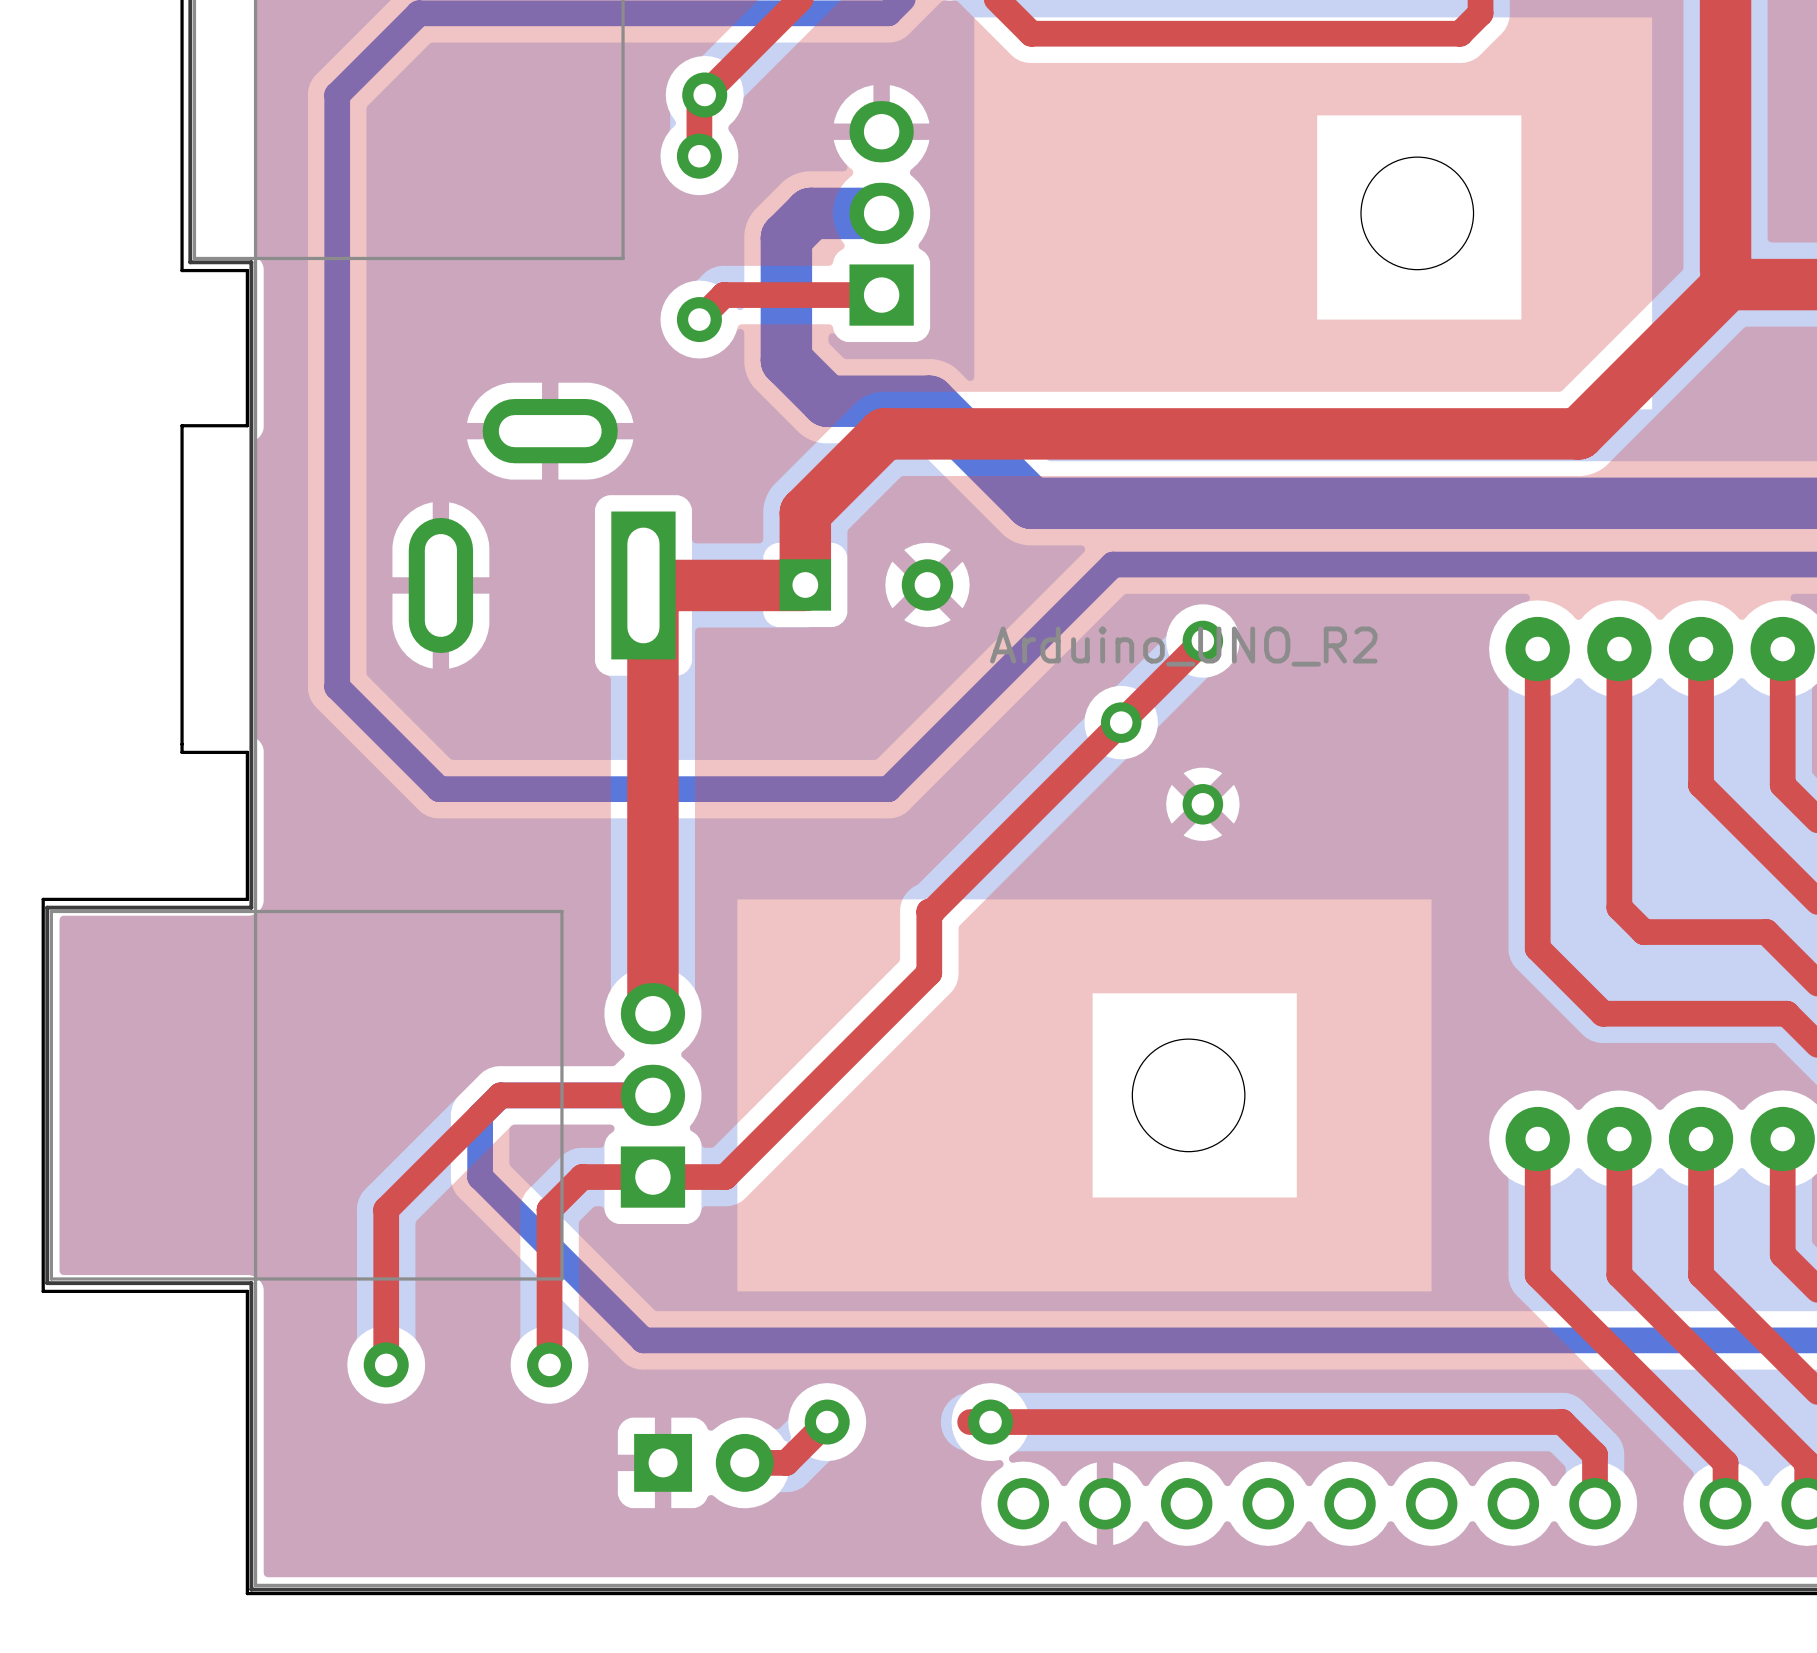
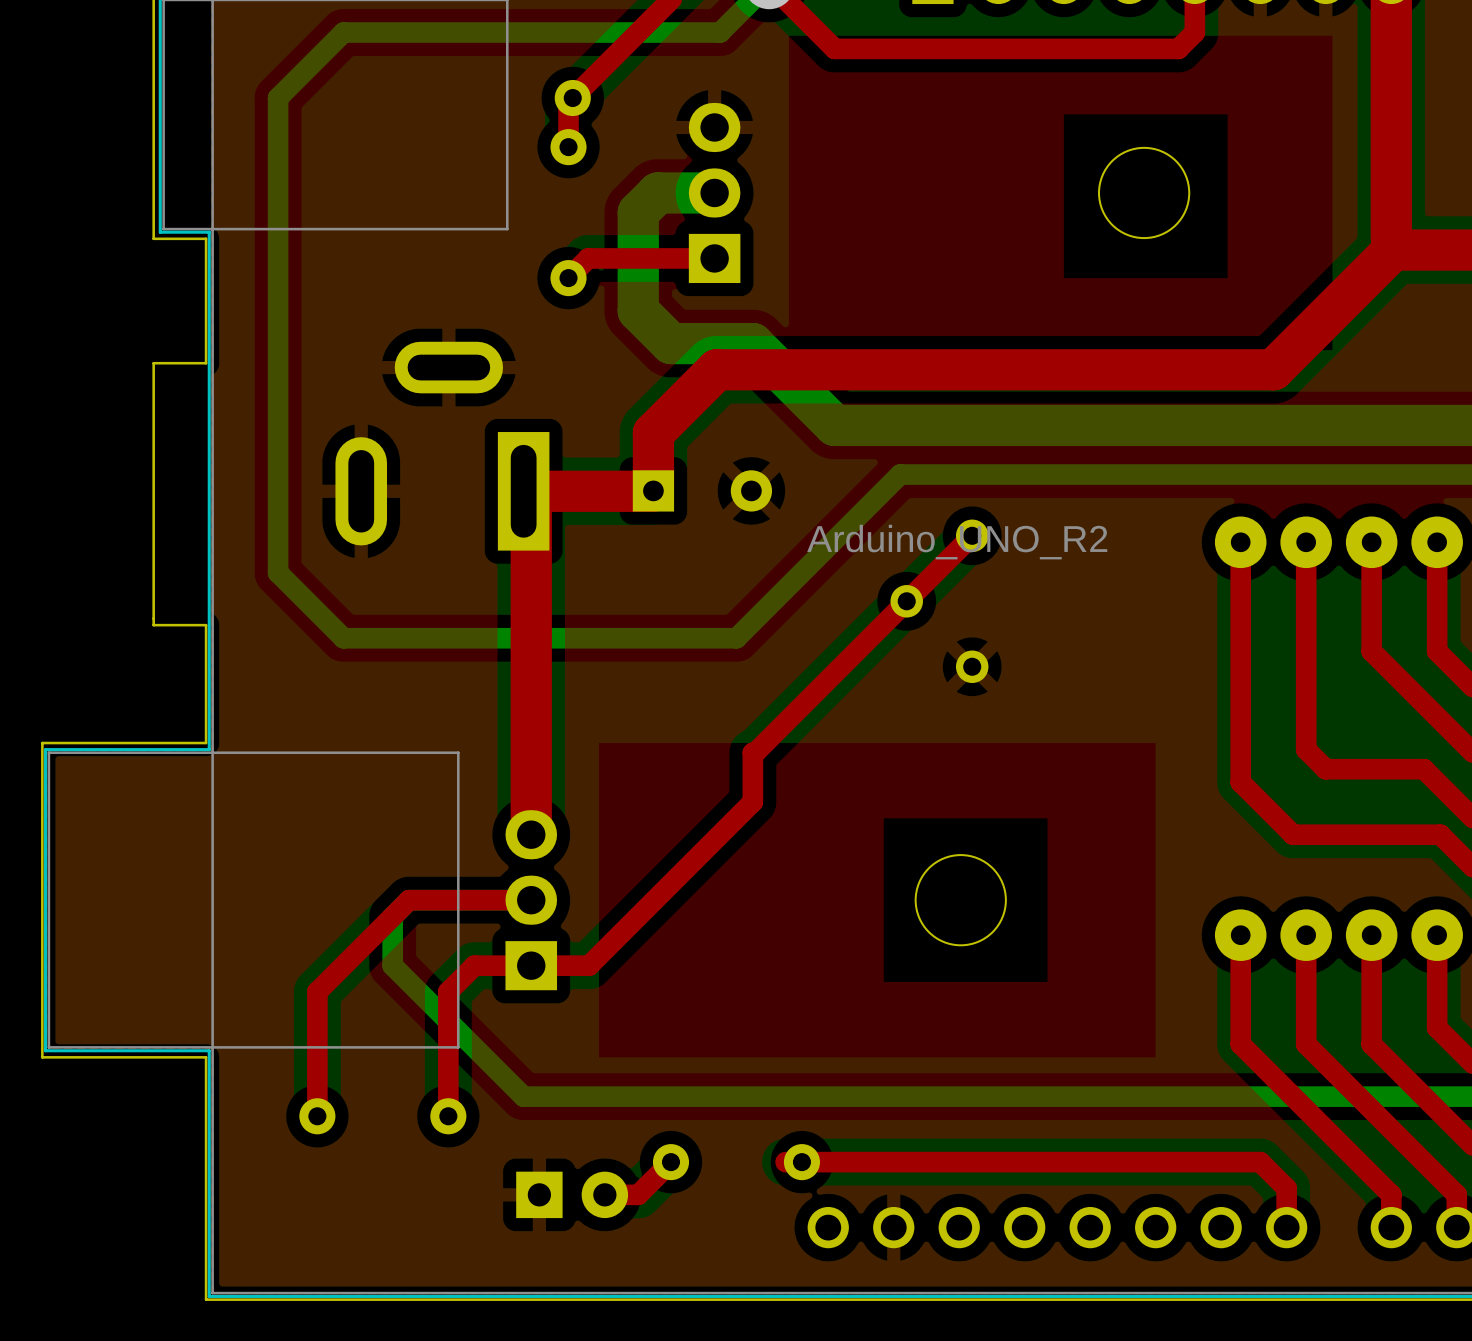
bottom track: (418, 768) (439, 789) (888, 789) (908, 768) -> (343, 638) (736, 638)

